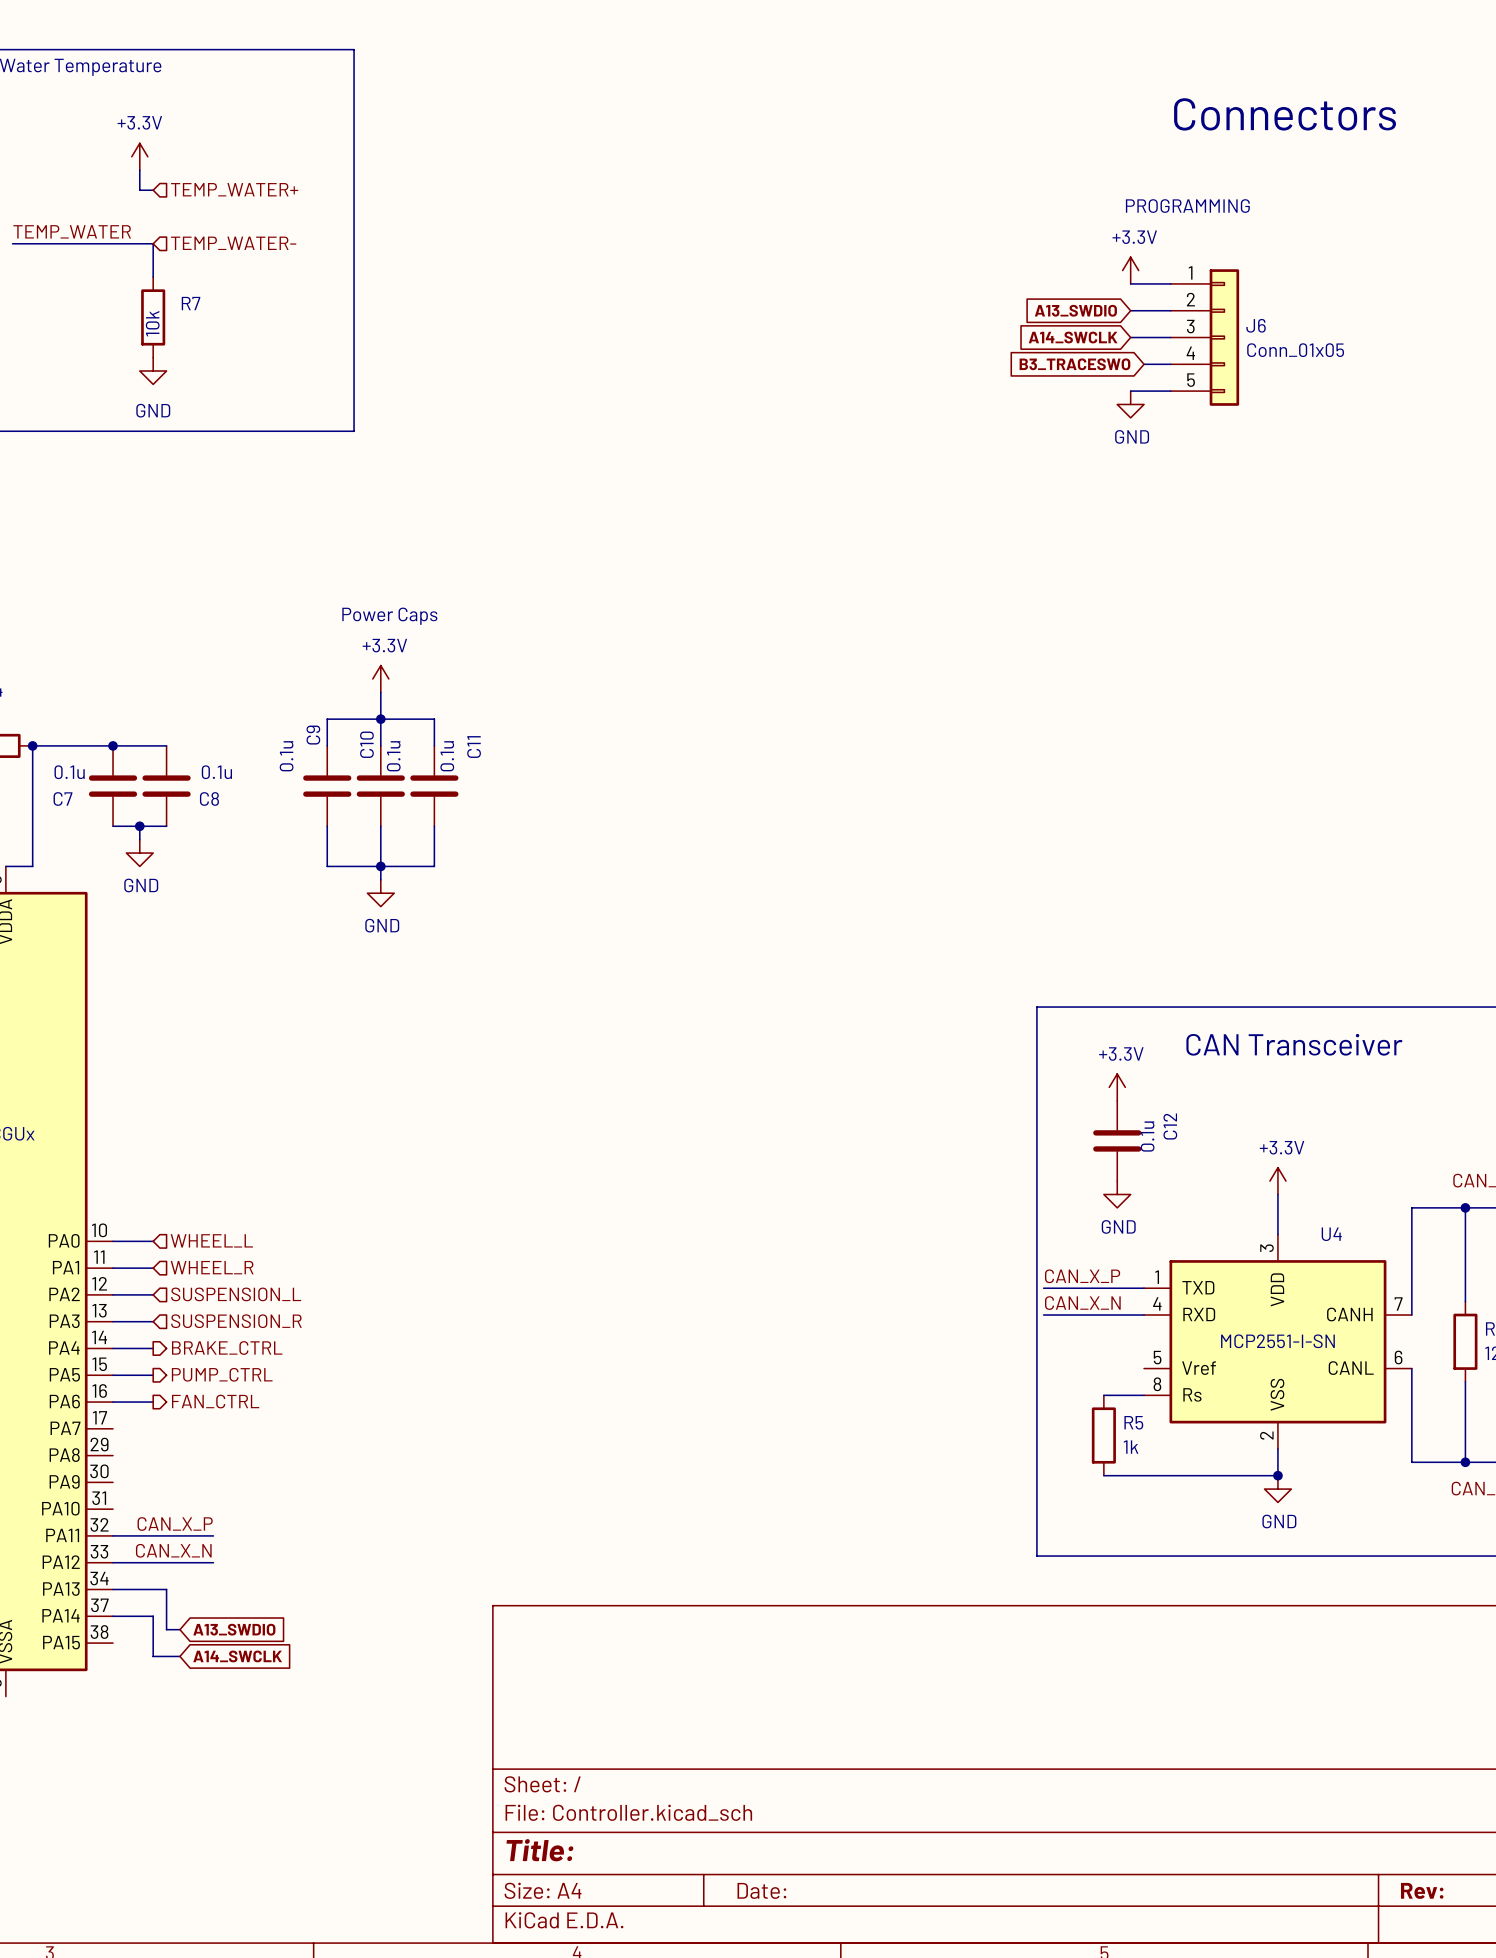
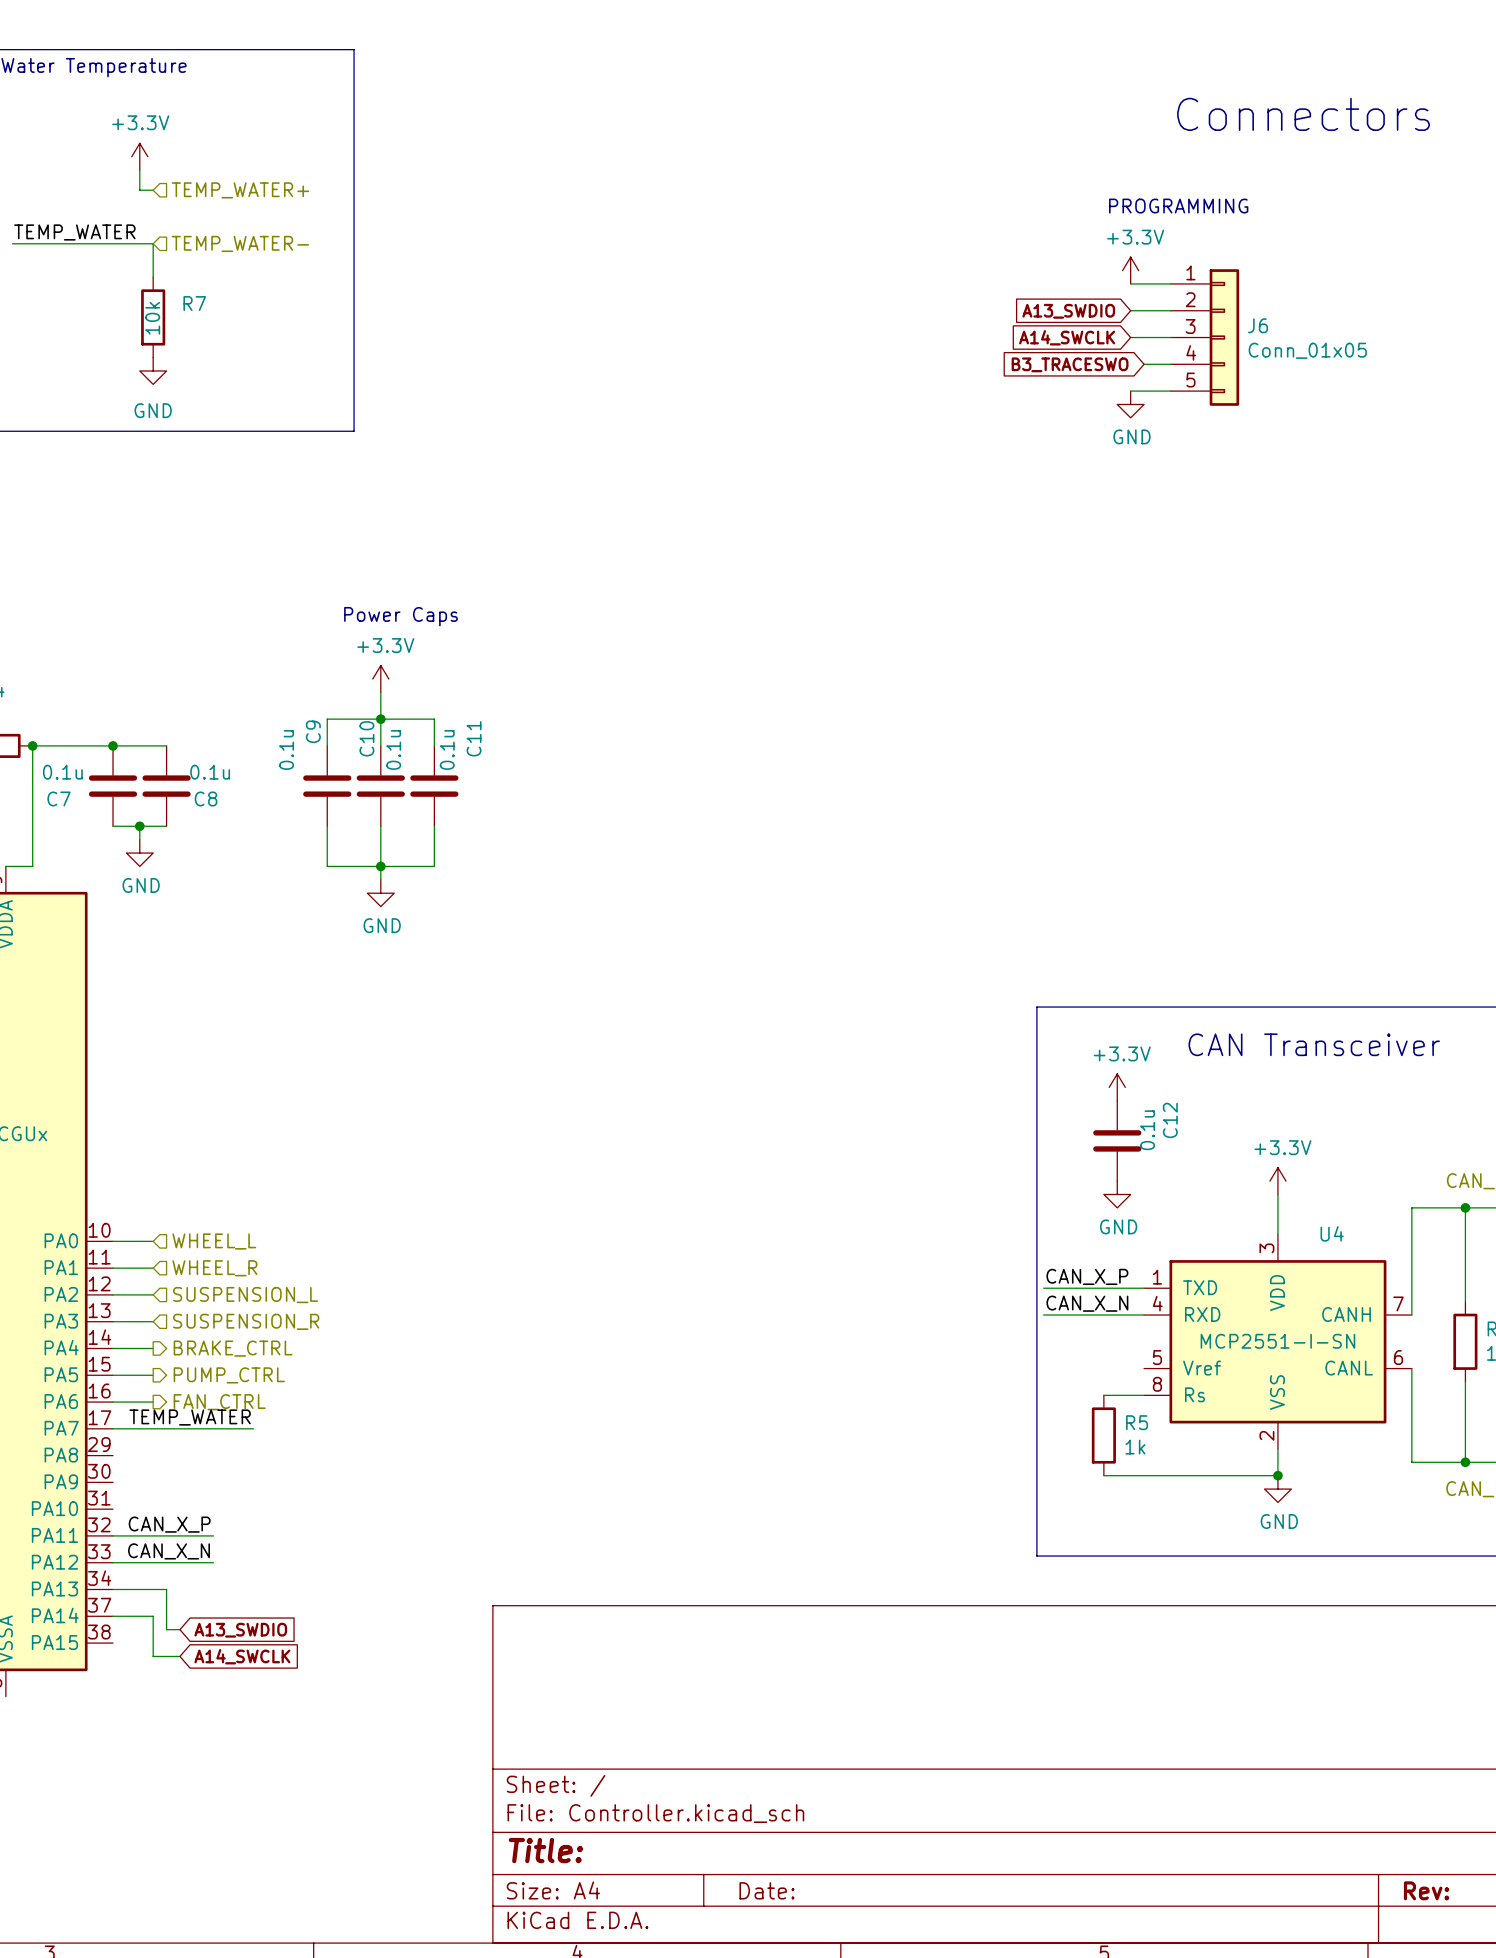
label: none -> TEMP_WATER (190, 1417)
wire: none -> (113, 1428) (253, 1428)

